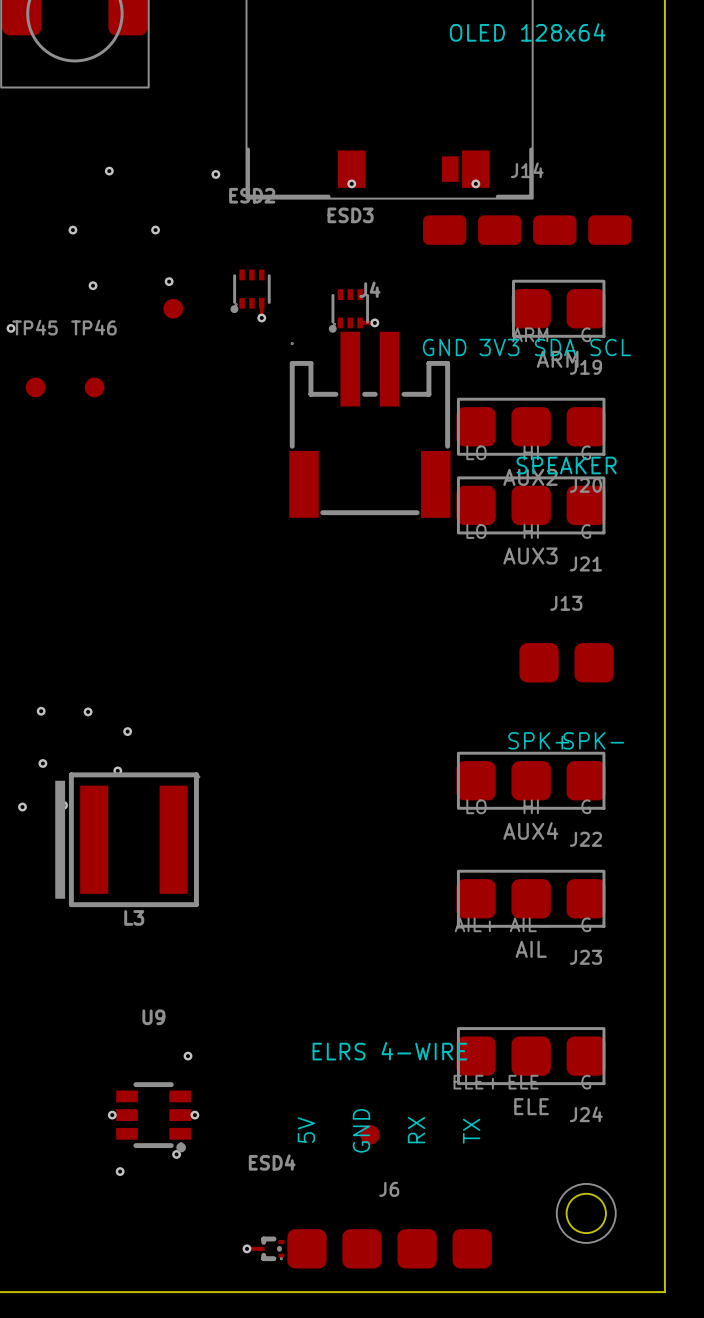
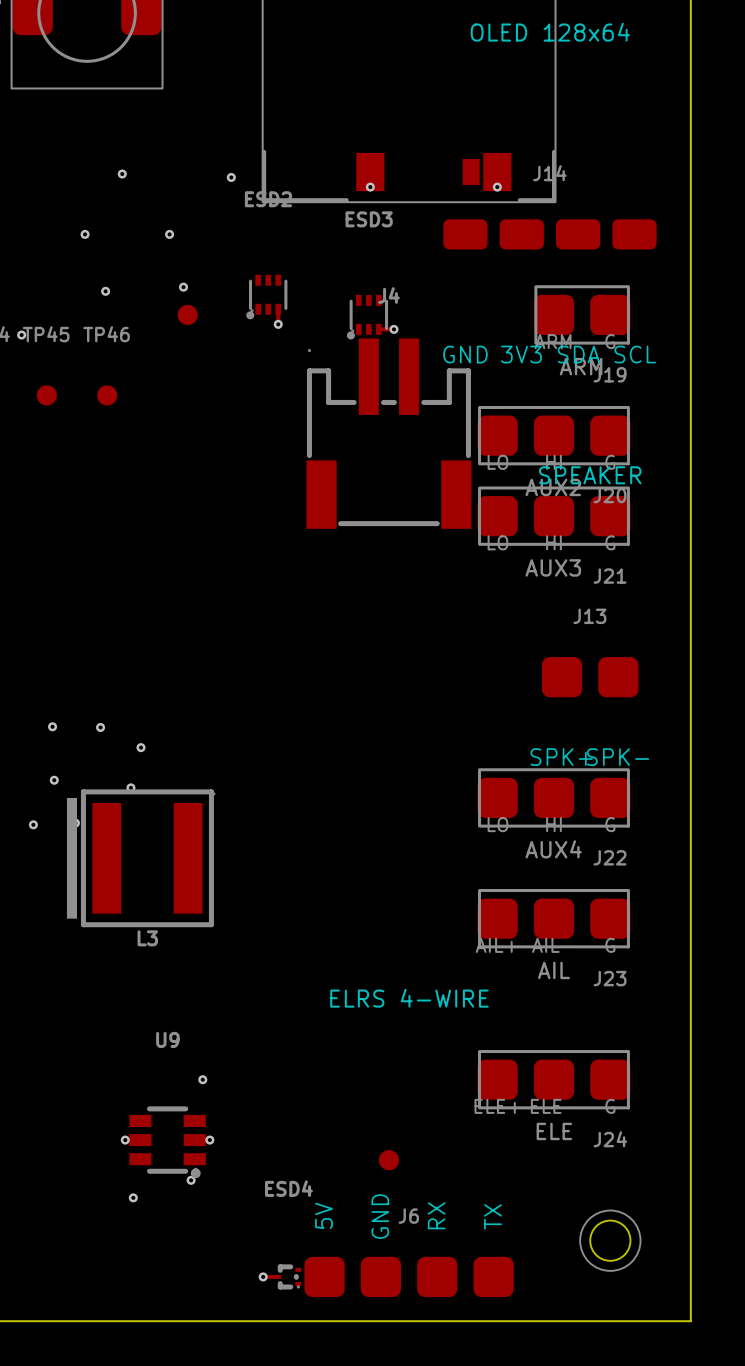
text position: ELRS 4-WIRE (389, 1051) -> ELRS 4-WIRE (409, 998)
text position: 5V (306, 1130) -> 5V (323, 1215)
text position: GND (361, 1130) -> GND (380, 1216)
text position: RX (416, 1130) -> RX (436, 1215)
text position: TX (471, 1131) -> TX (493, 1216)

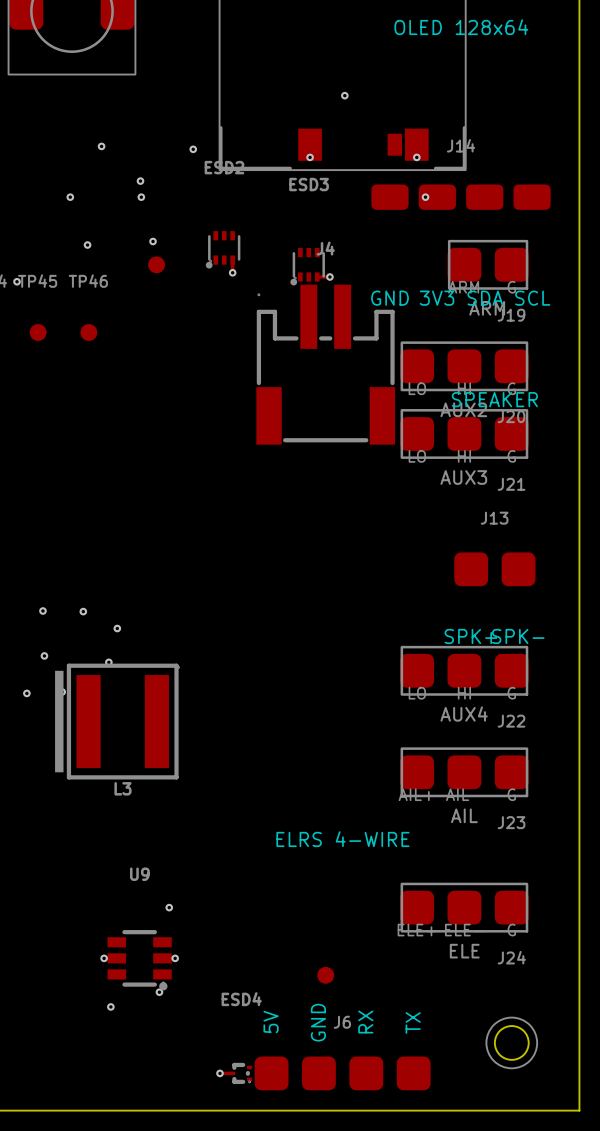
via: none -> (344, 95)
via: none -> (140, 181)
via: none -> (425, 197)

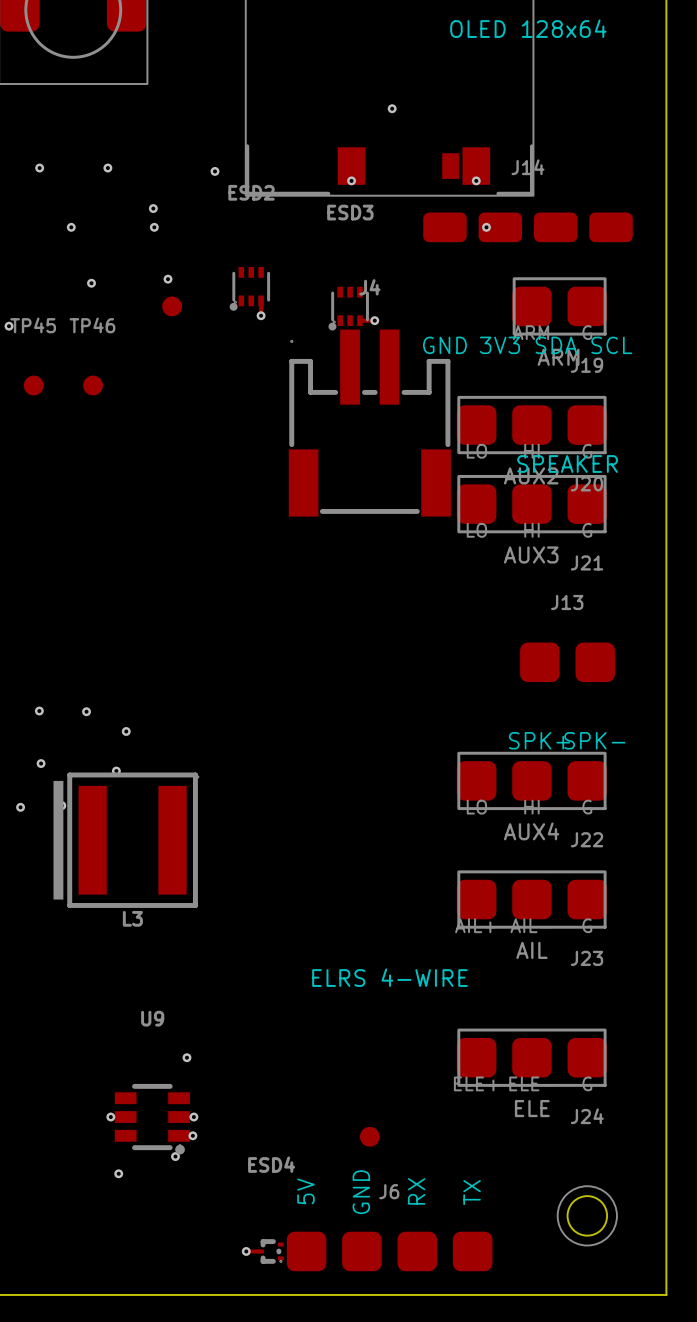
via: none -> (39, 168)
via: none -> (192, 1135)

